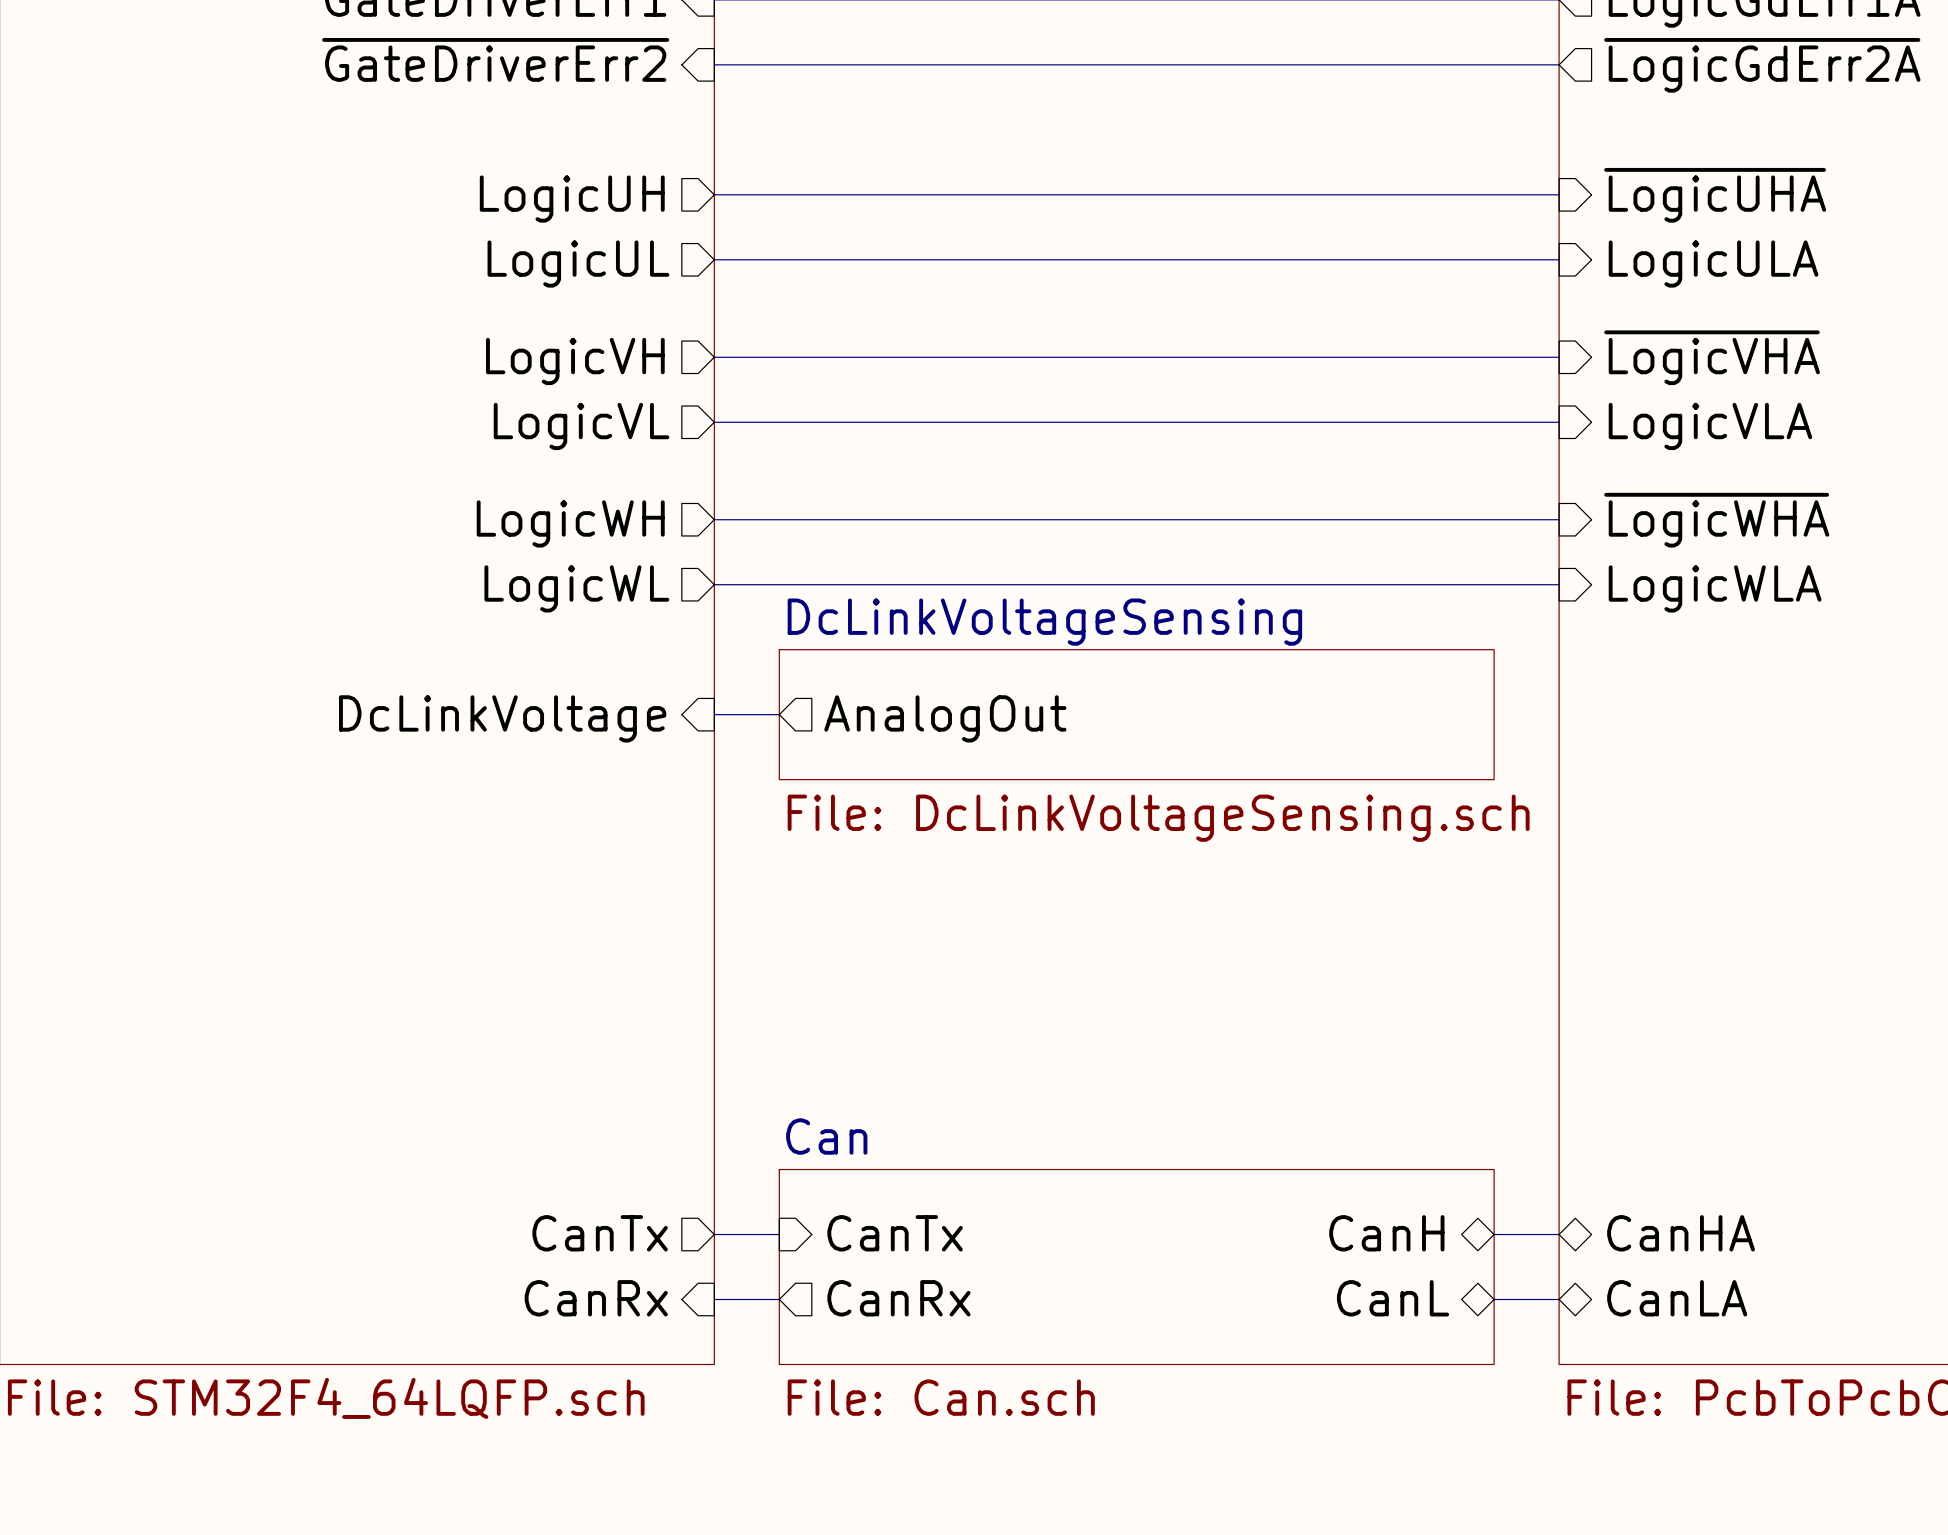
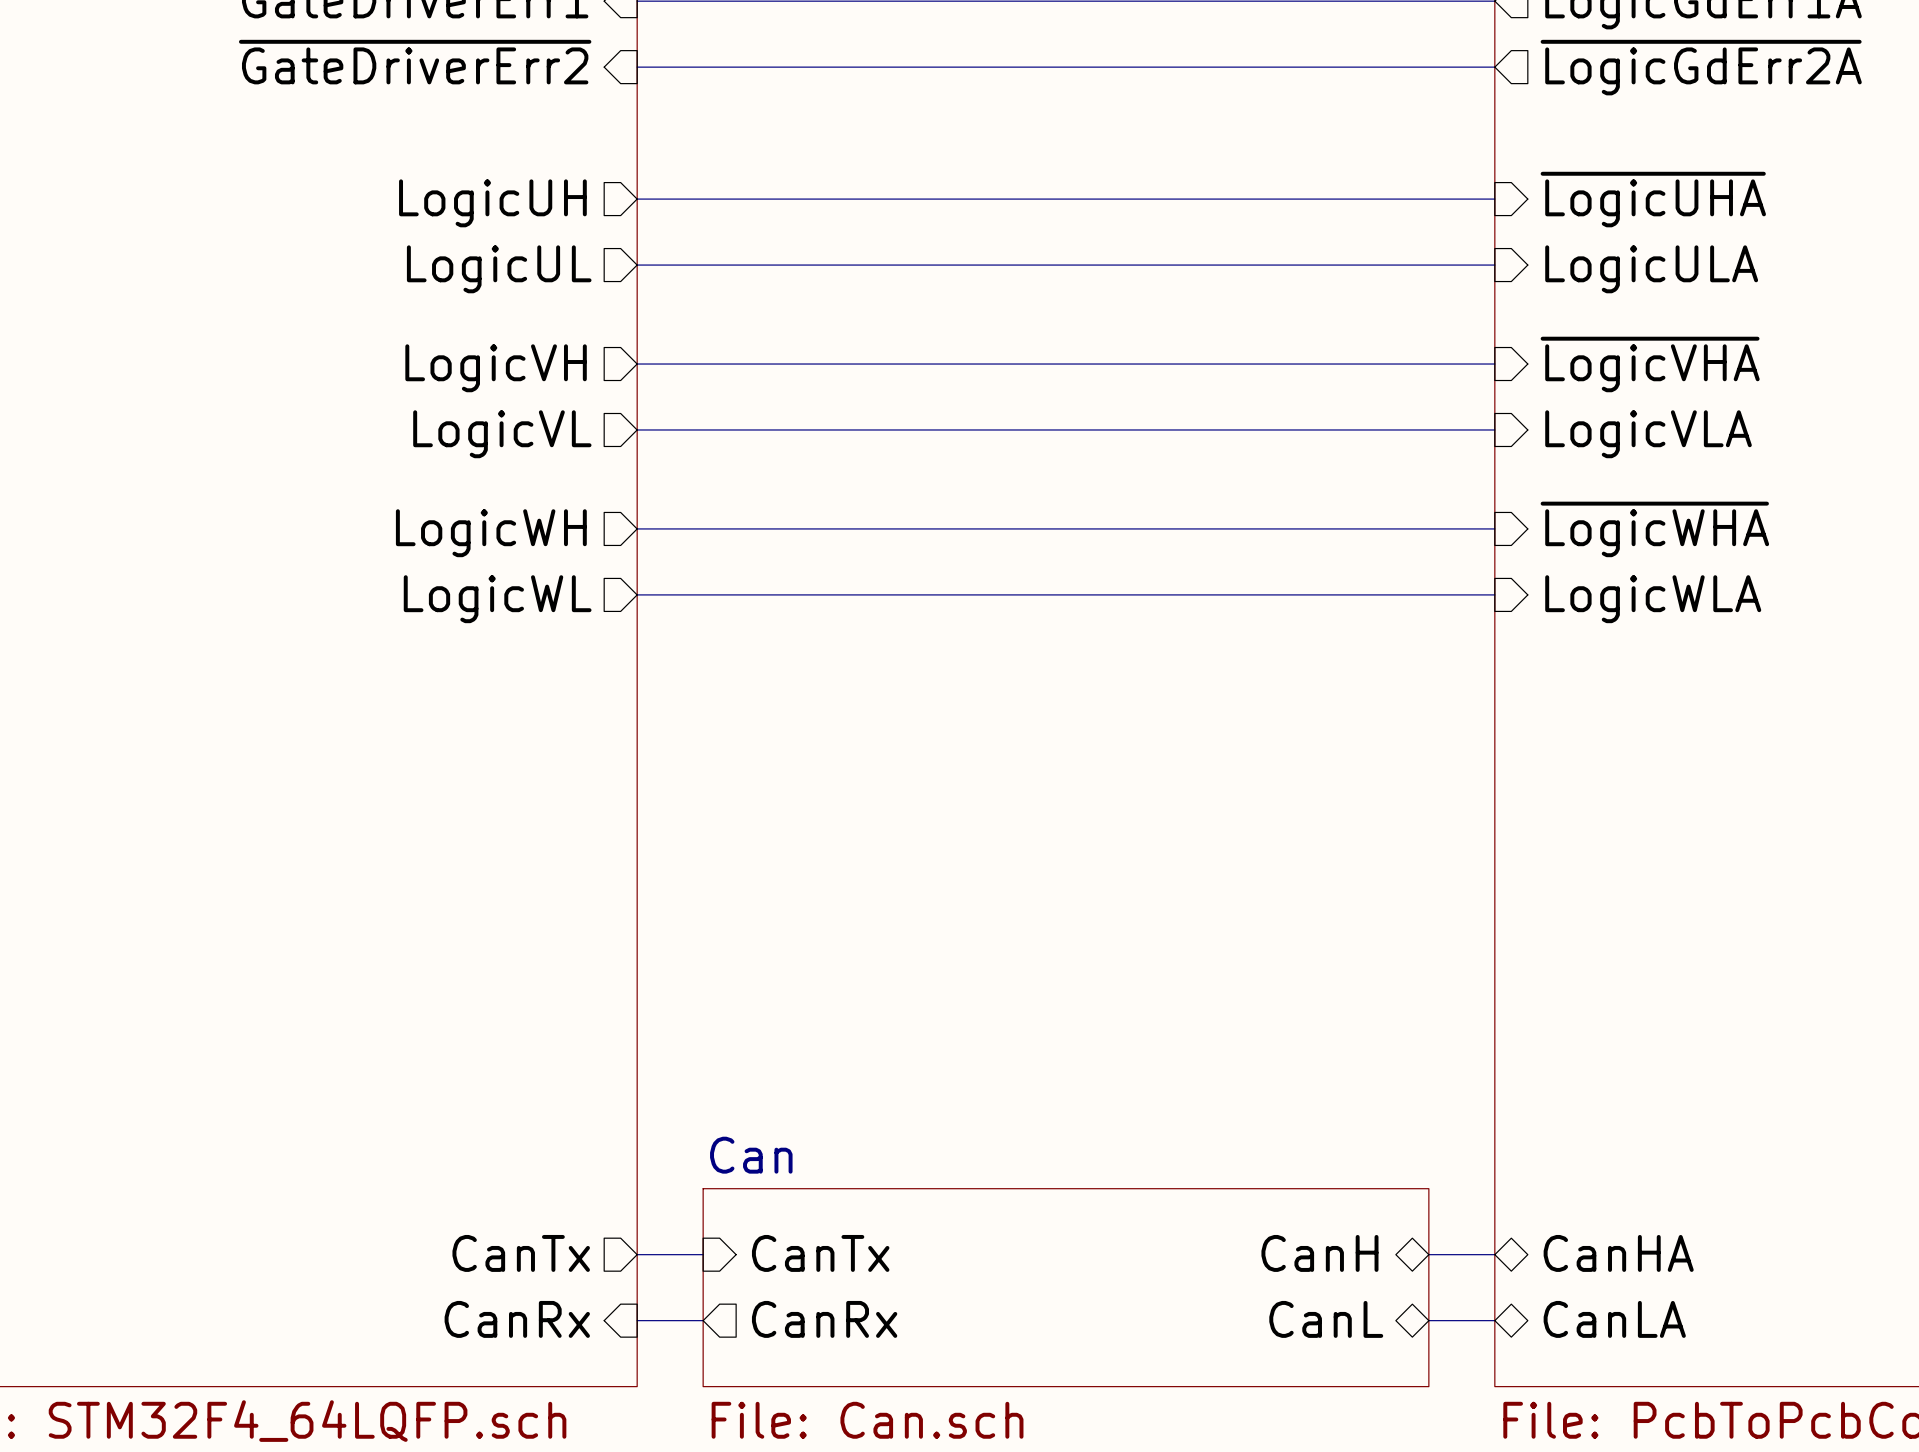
wire: (714, 714) (779, 714) -> none
sheet DcLinkVoltageSensing: File: DcLinkVoltageSensing.sch (1136, 714) -> none
sheet pin: DcLinkVoltage (502, 718) -> none
sheet pin: AnalogOut (945, 718) -> none

